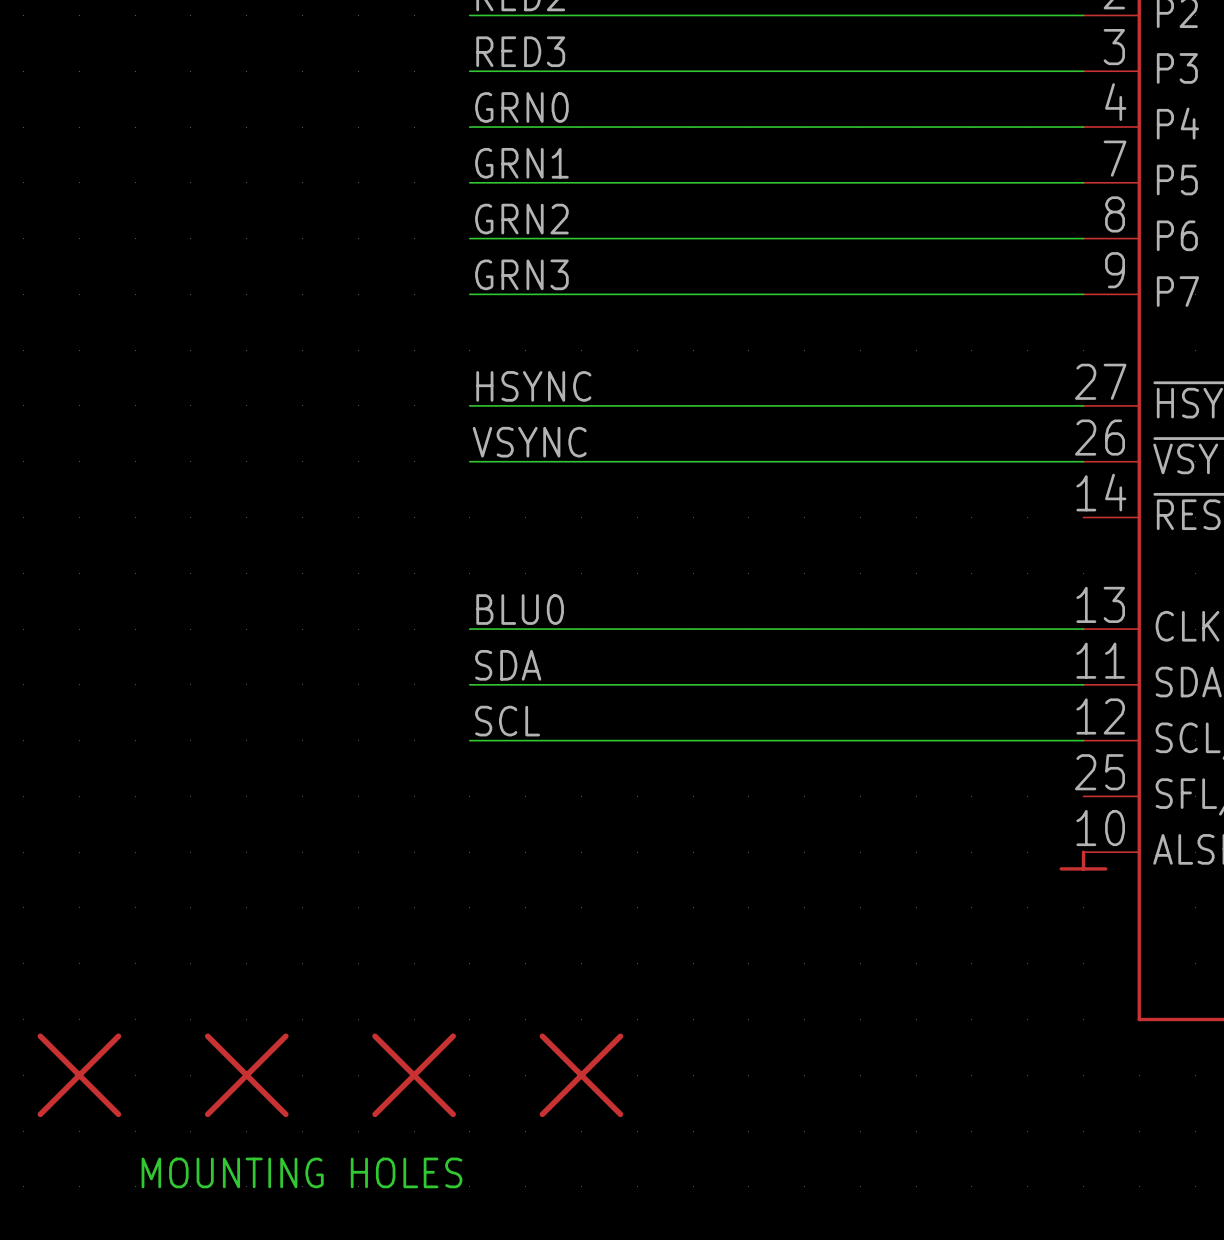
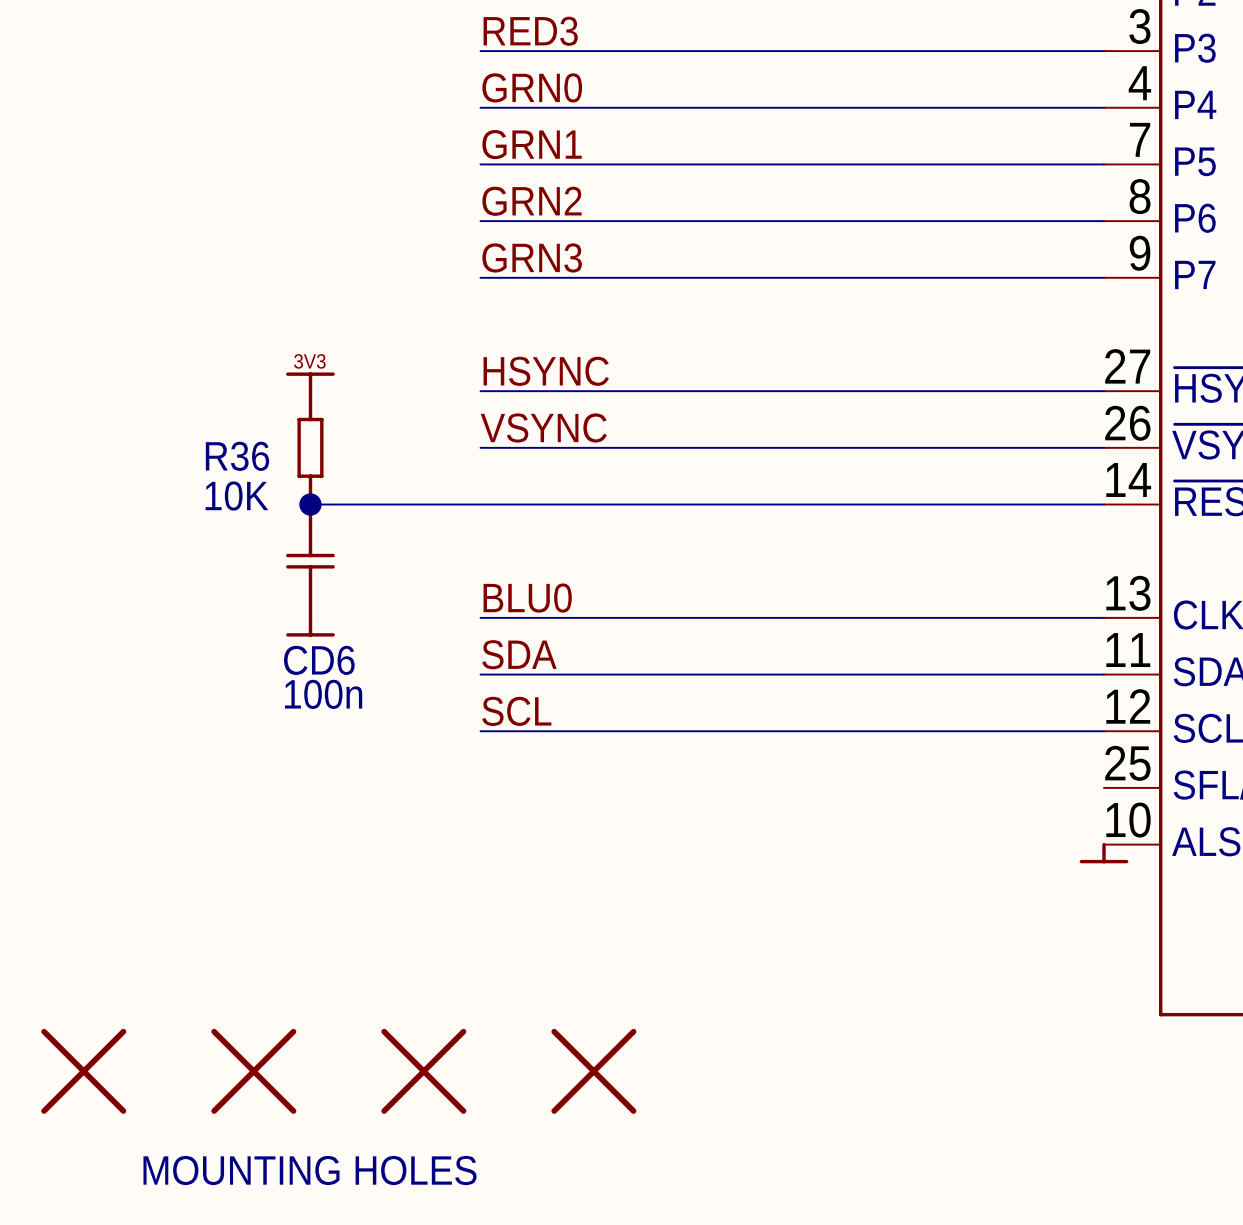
power symbol: none -> (310, 382)
R36: none -> 10K (310, 447)
wire: none -> (310, 504) (1104, 504)
junction: none -> (310, 504)
CD6: none -> 100n (310, 561)
power symbol: none -> (310, 626)

